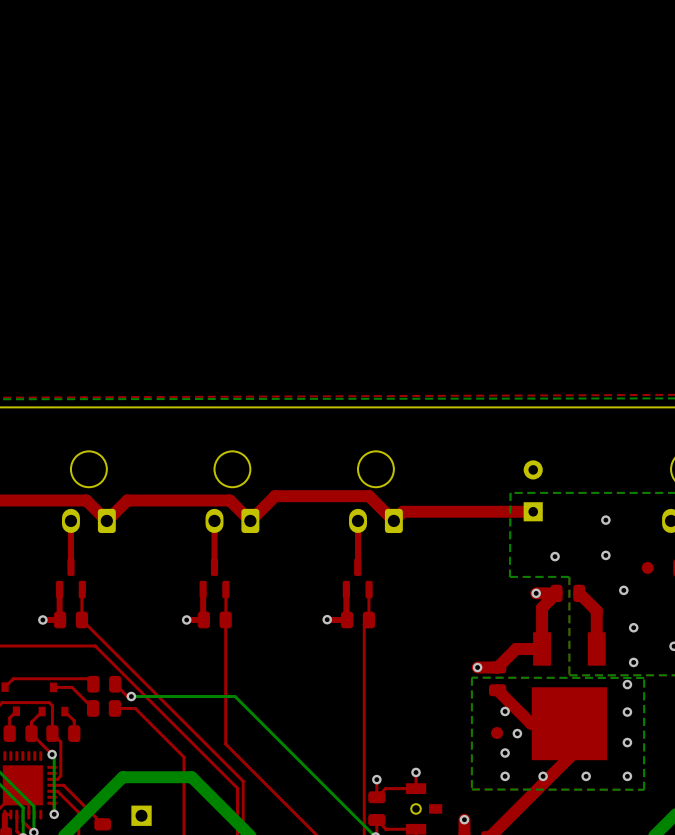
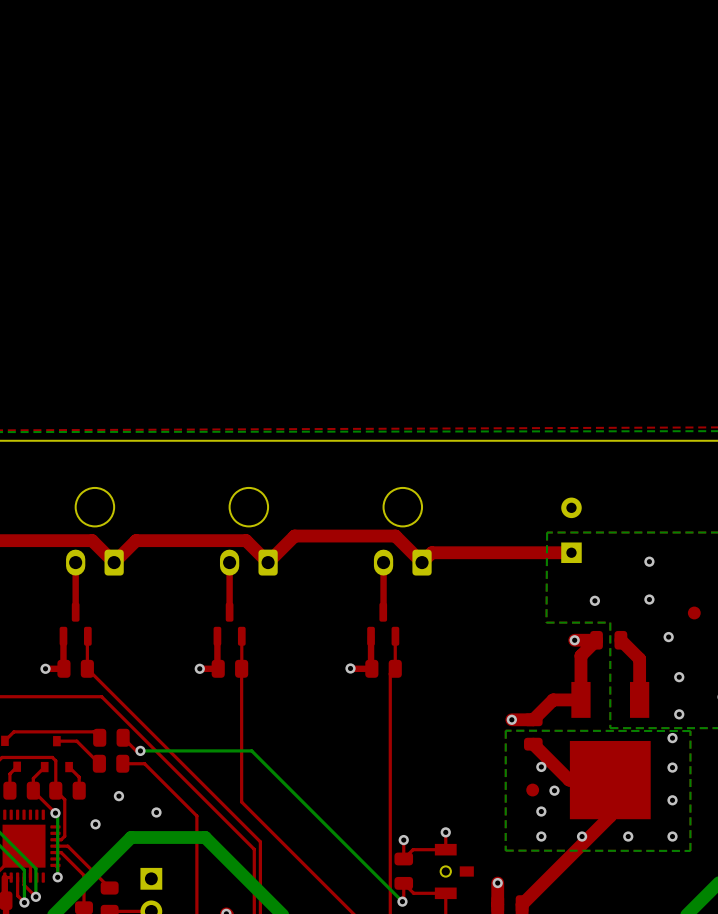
via: none -> (118, 796)
via: none -> (156, 812)
via: none -> (95, 824)

